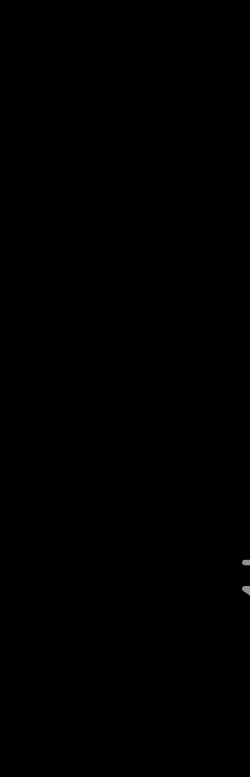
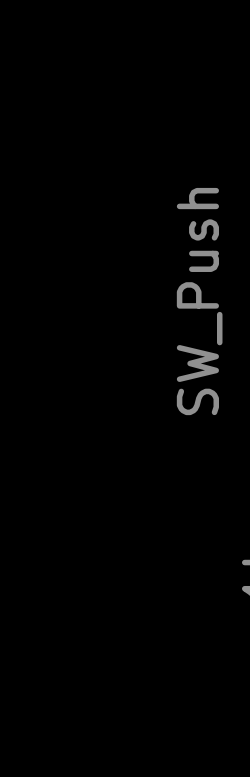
part value: none -> SW_Push (199, 301)

